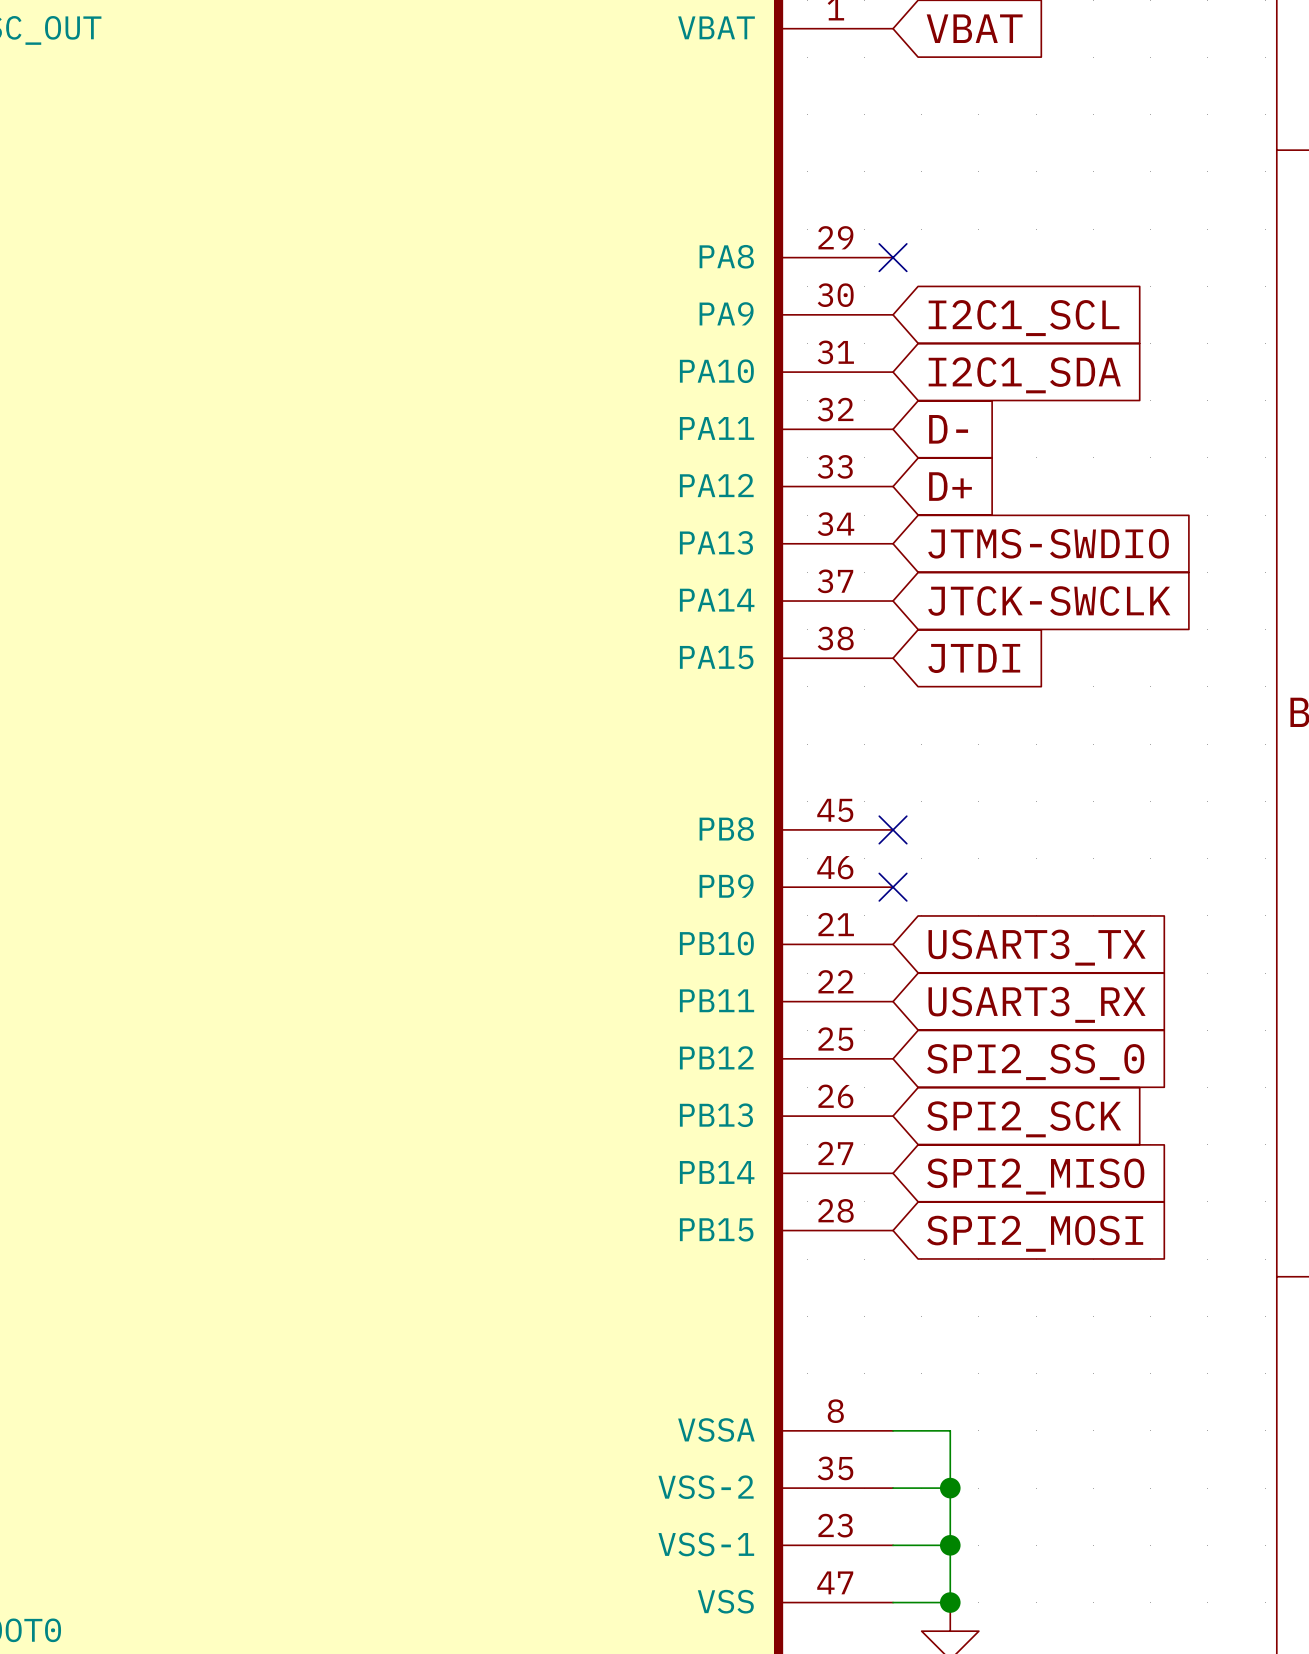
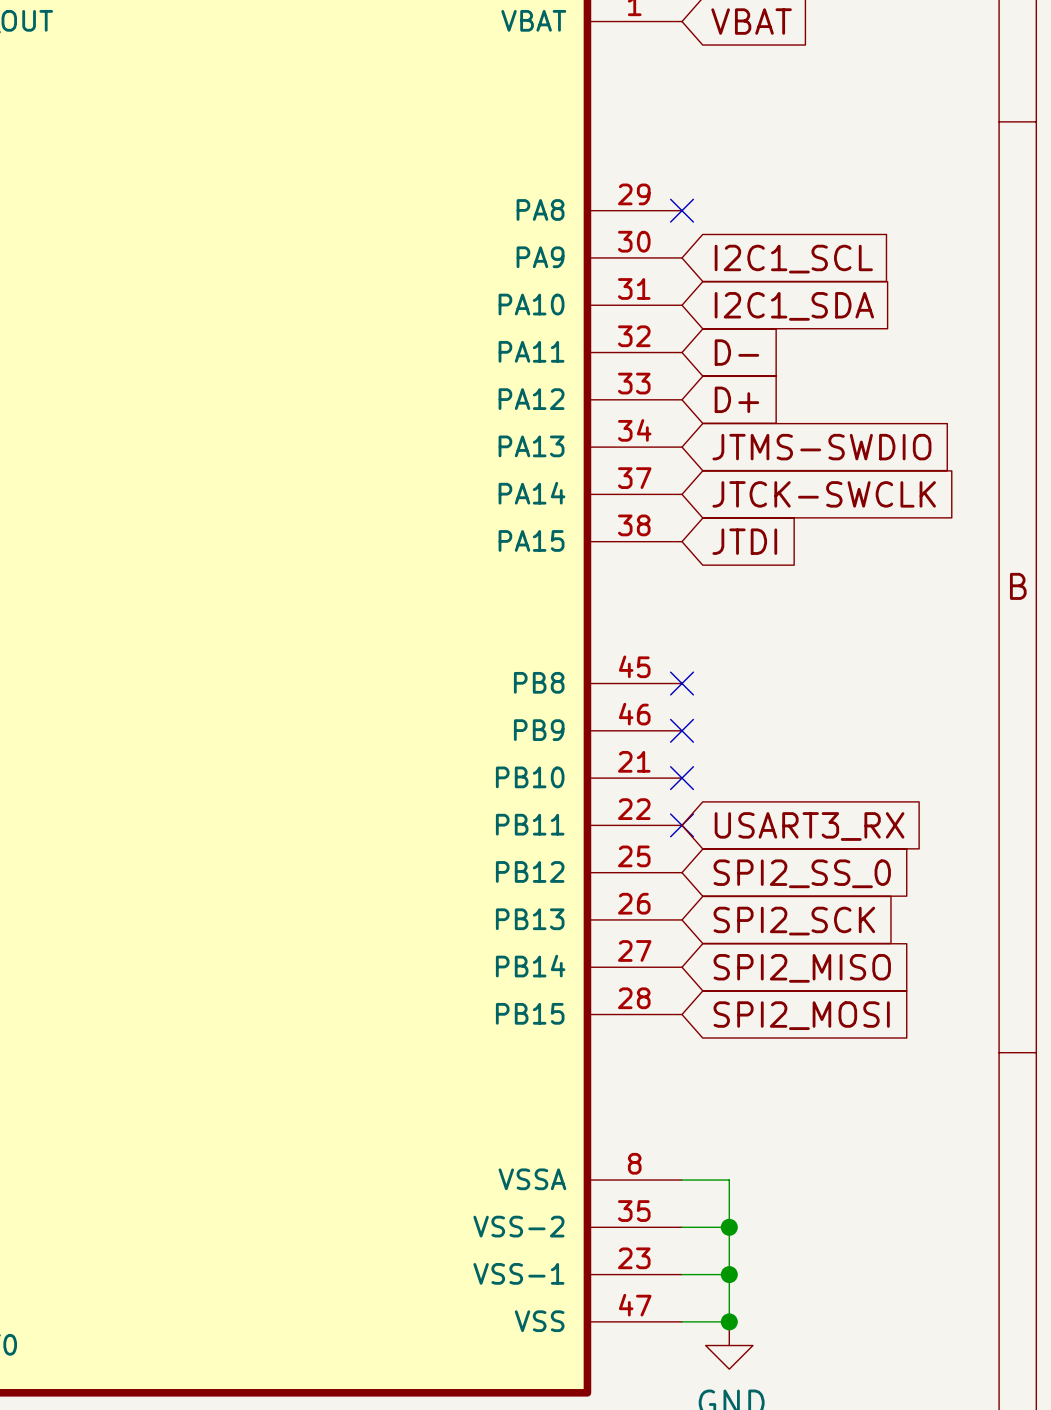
no-connect mark: none -> (682, 778)
global label: USART3_TX (1037, 947) -> none
no-connect mark: none -> (682, 825)

